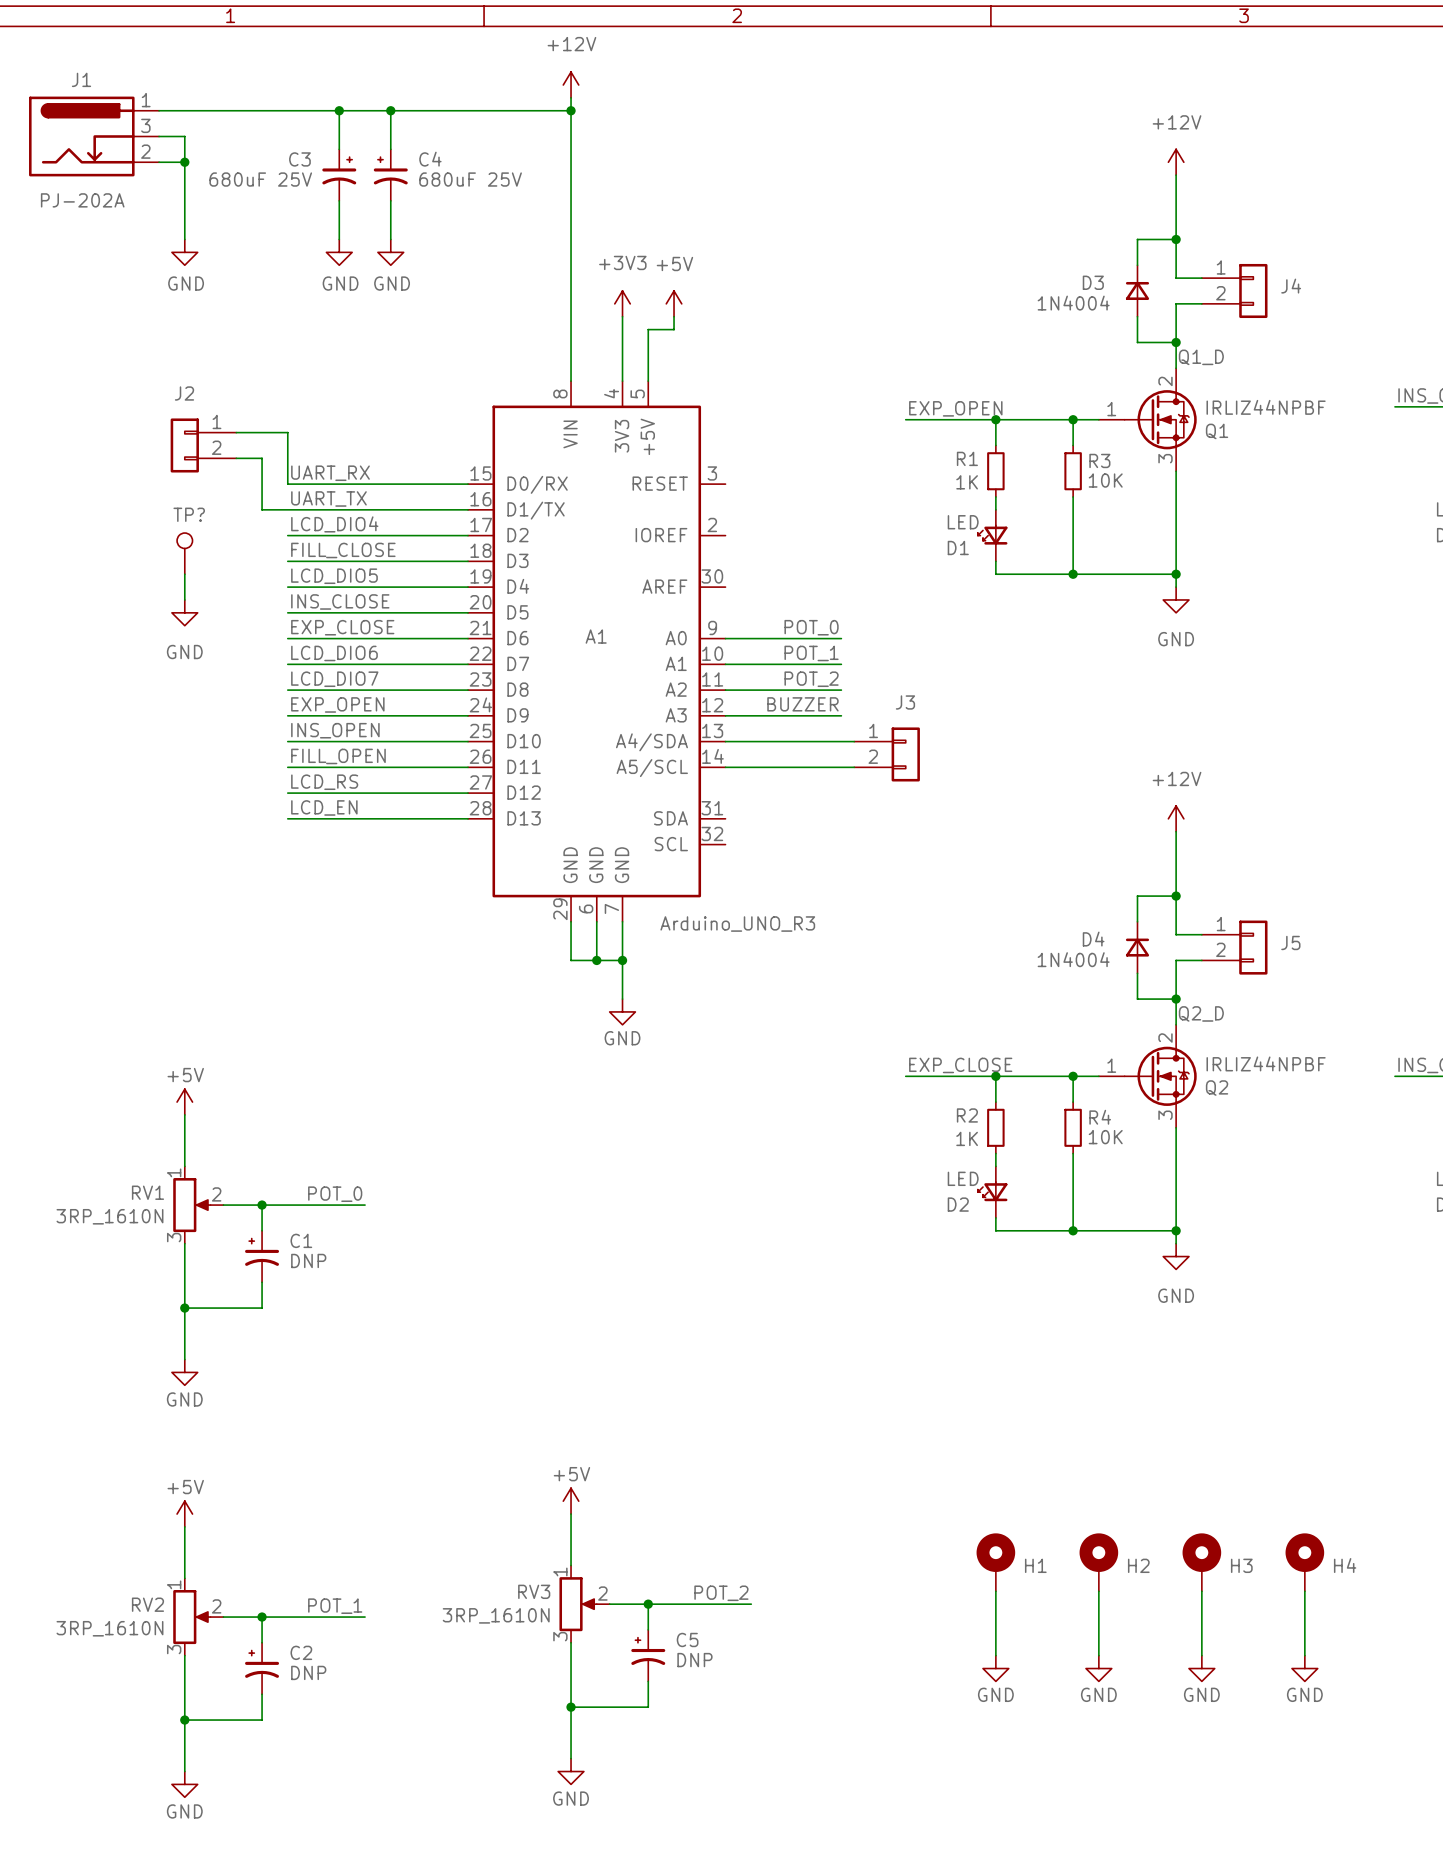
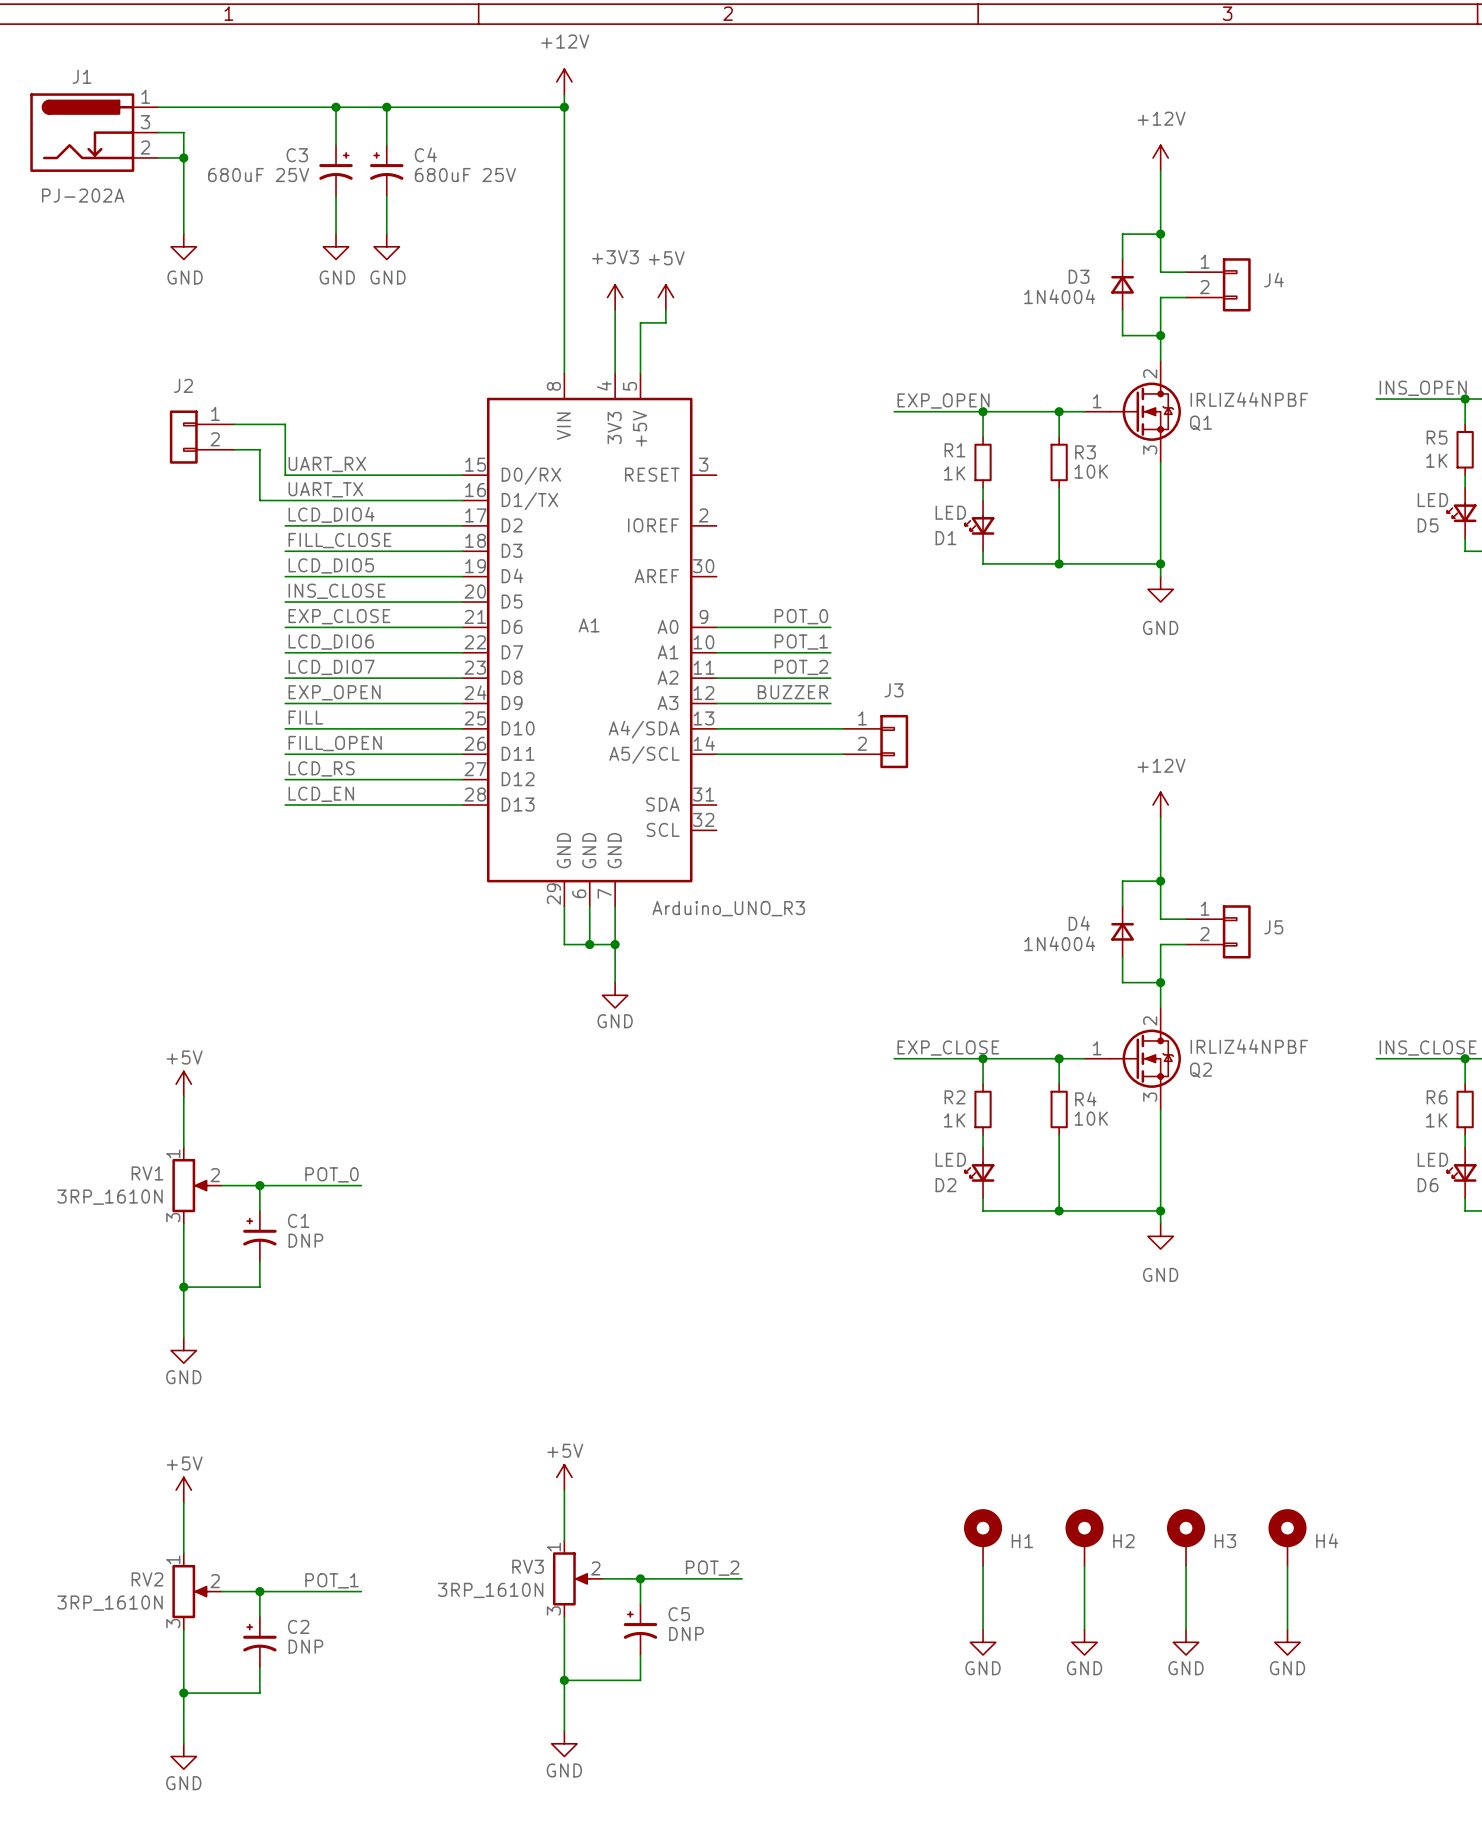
label: Q1_D (1201, 357) -> none
TP?: (184, 553) -> none
wire: (184, 574) (184, 599) -> none
power symbol: GND (184, 612) -> none
label: INS_OPEN (335, 730) -> FILL (305, 717)
label: Q2_D (1201, 1013) -> none

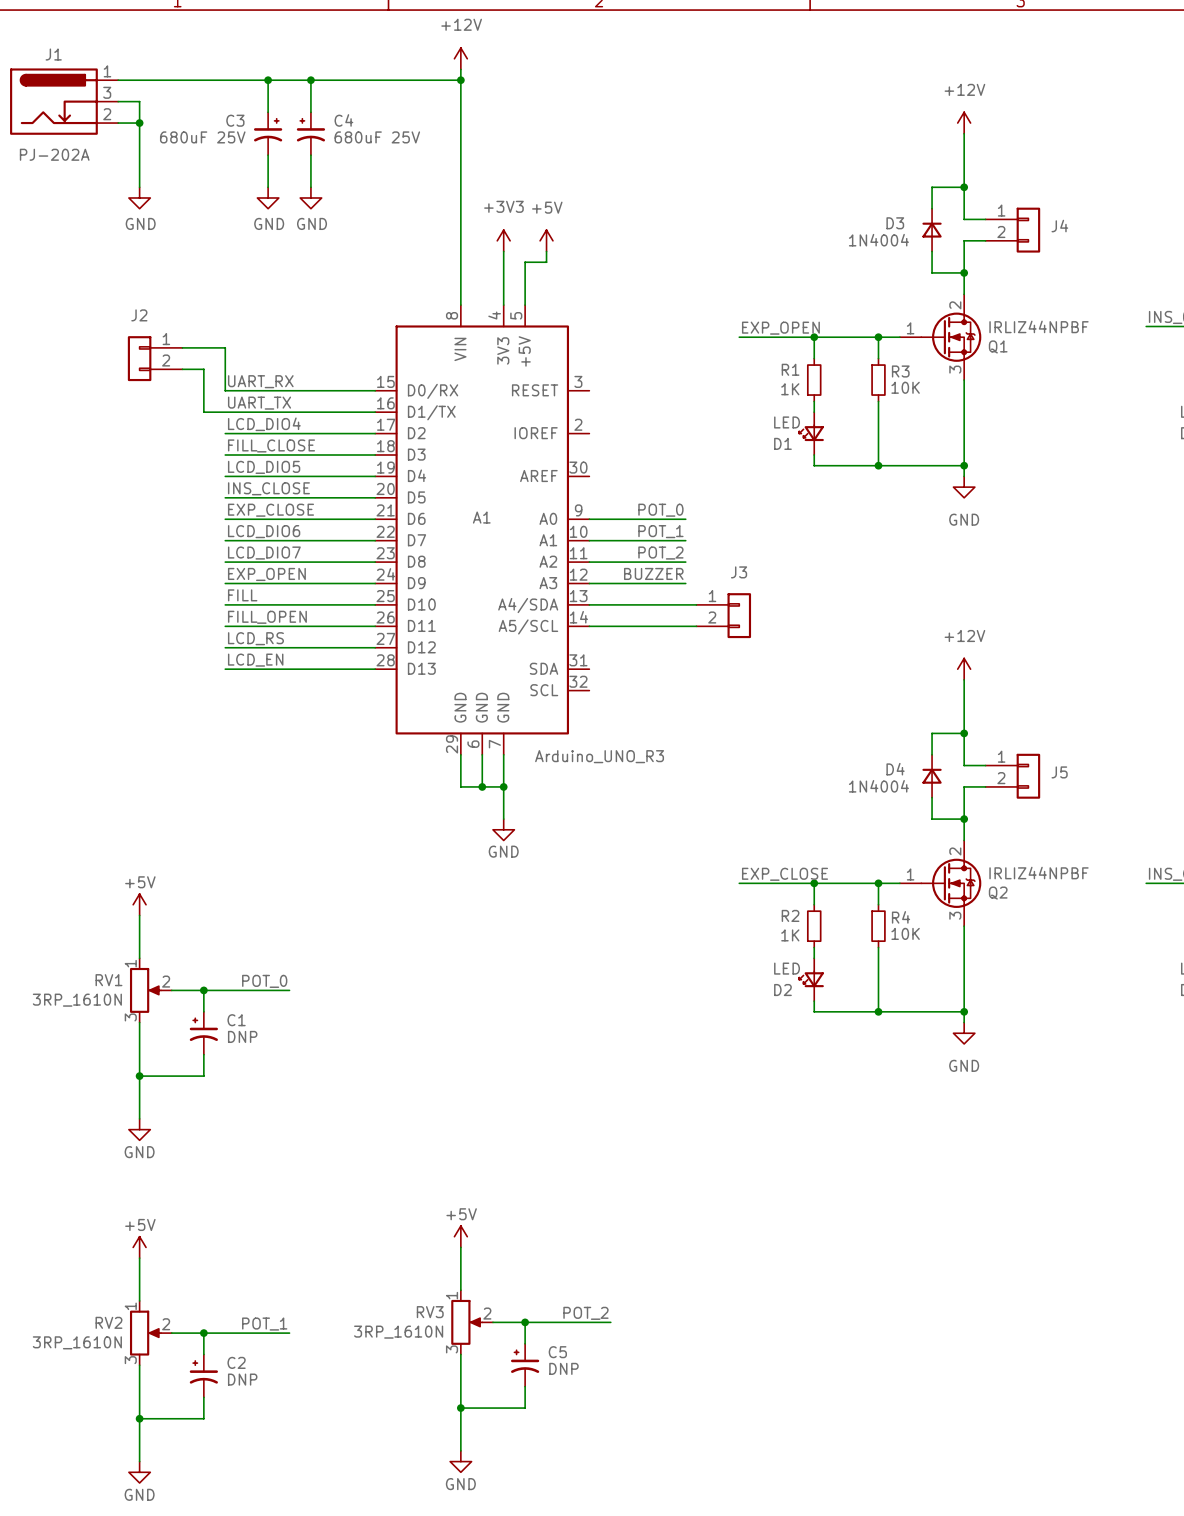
H1: (983, 1537) -> none
H2: (1084, 1537) -> none
H3: (1186, 1537) -> none
H4: (1287, 1537) -> none
wire: (983, 1566) (983, 1629) -> none
wire: (1084, 1566) (1084, 1629) -> none
wire: (1186, 1566) (1186, 1629) -> none
wire: (1287, 1566) (1287, 1629) -> none
power symbol: GND (983, 1642) -> none
power symbol: GND (1084, 1642) -> none
power symbol: GND (1186, 1642) -> none
power symbol: GND (1287, 1642) -> none

